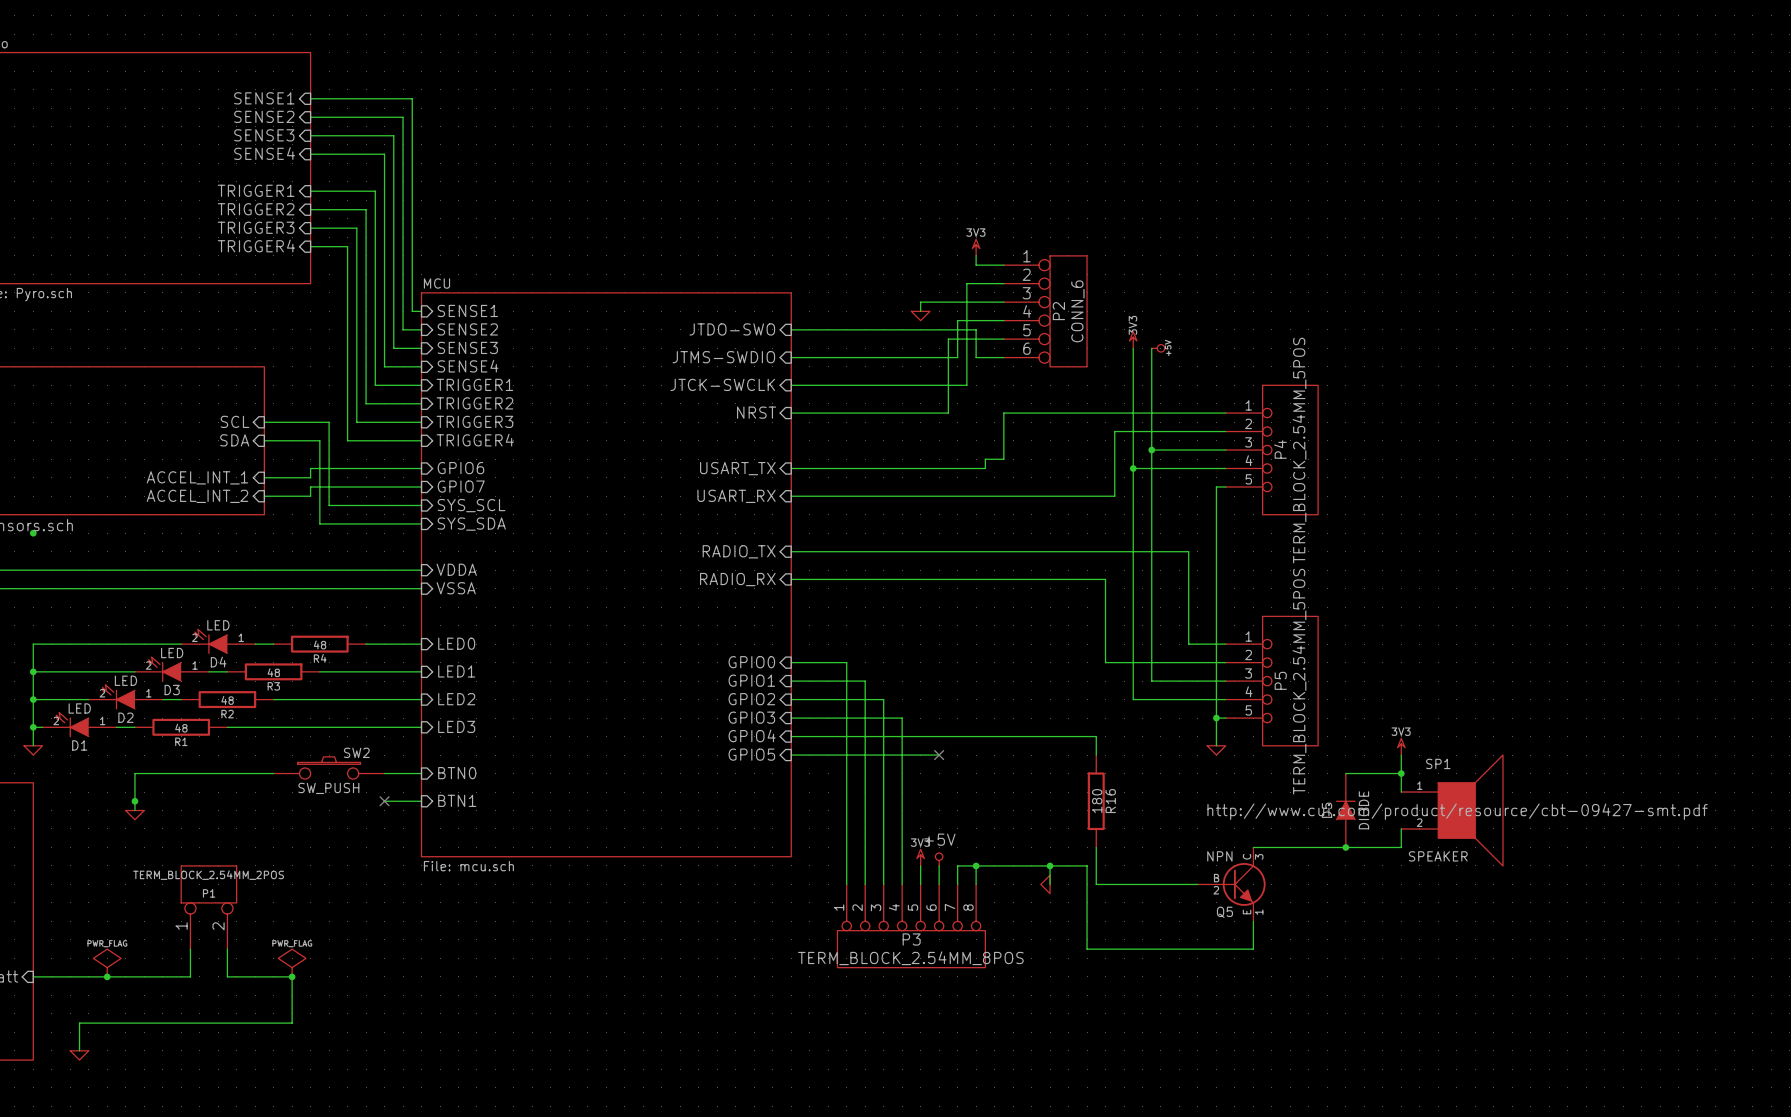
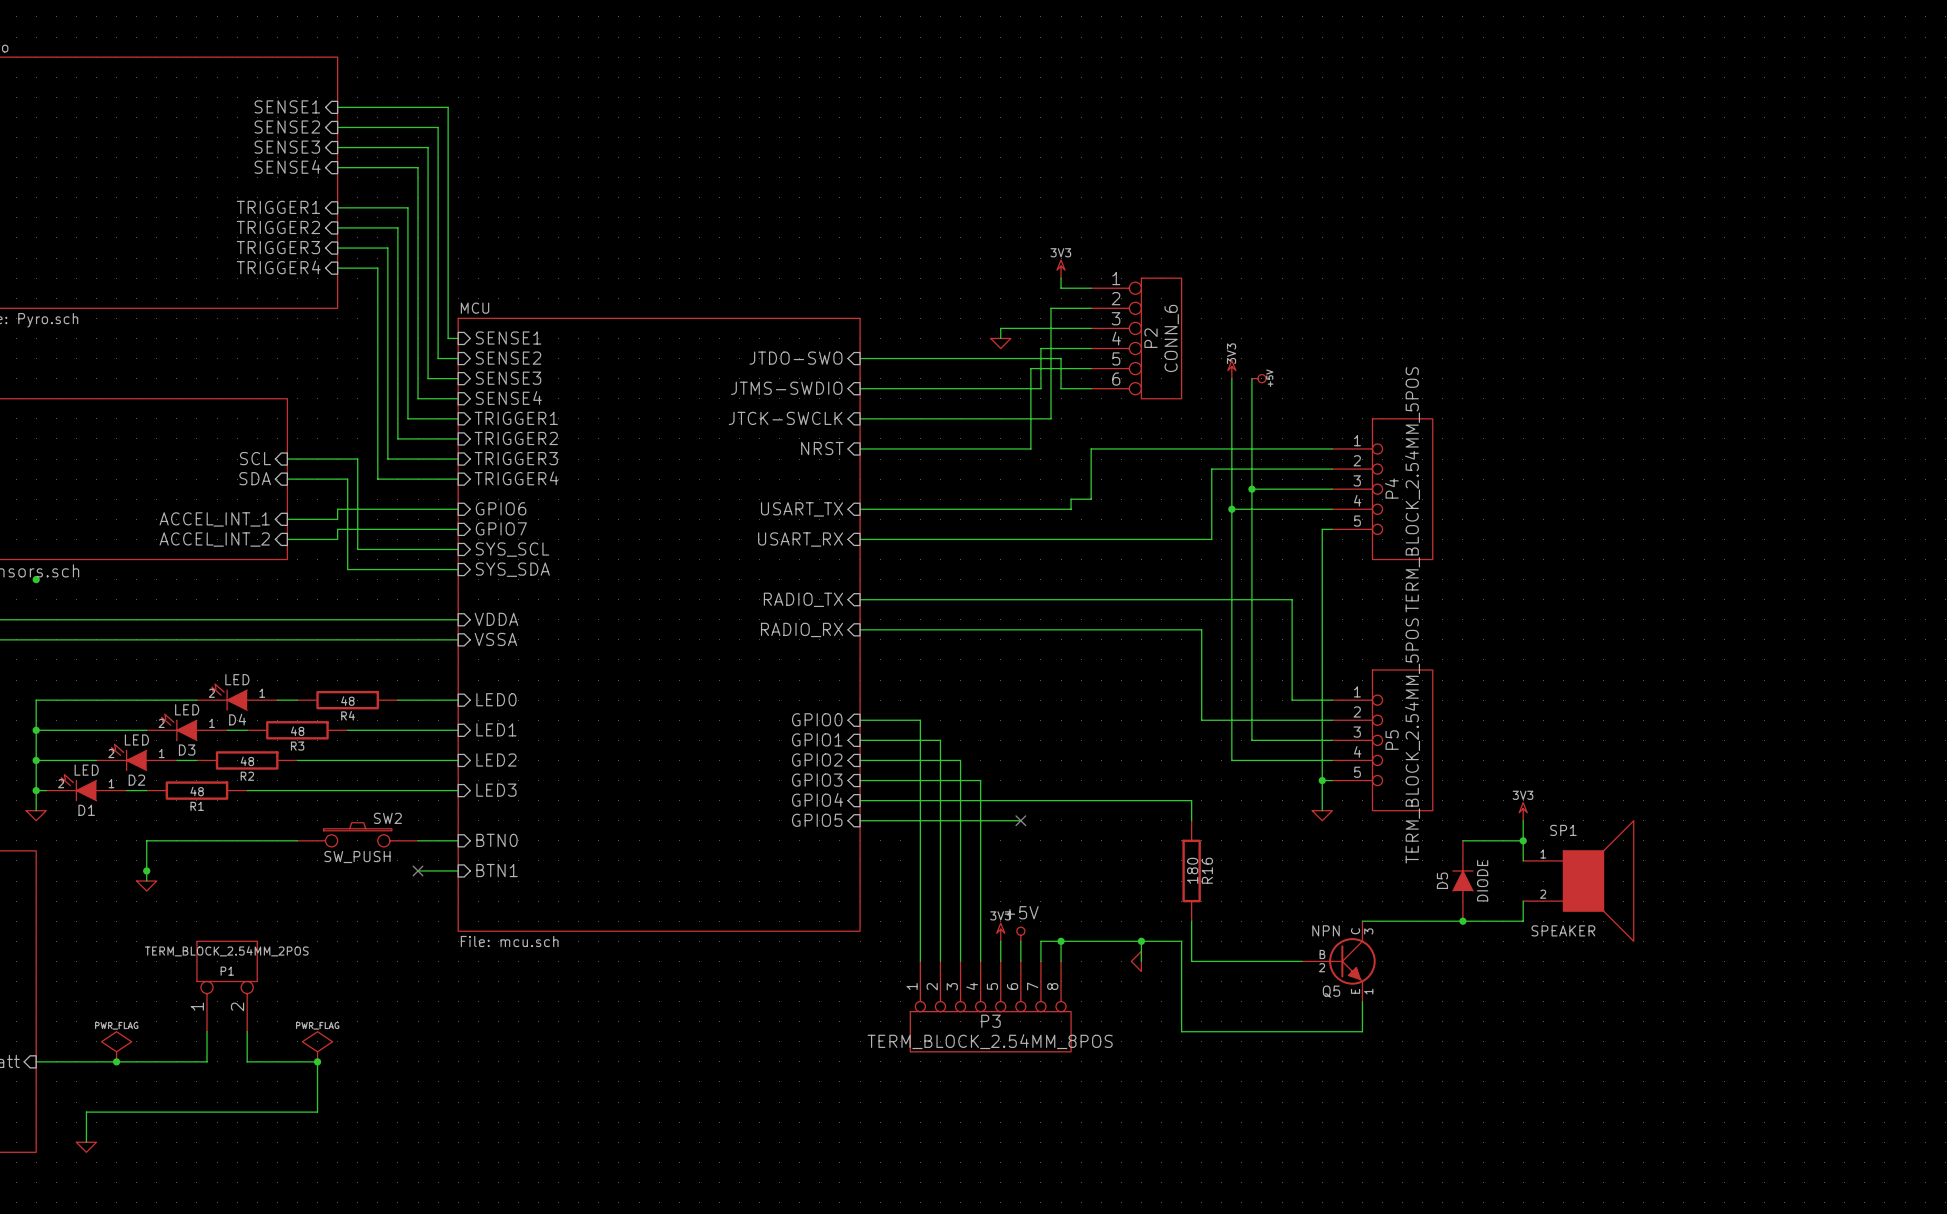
SP1 text: http://www.cui.com/product/resource/cbt-09427-smt.pdf (1457, 811) -> none

